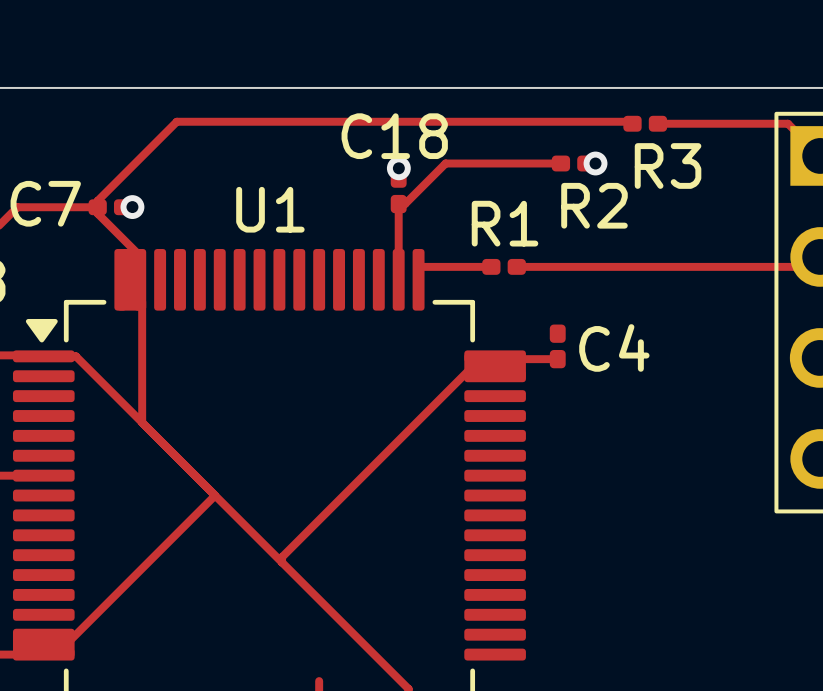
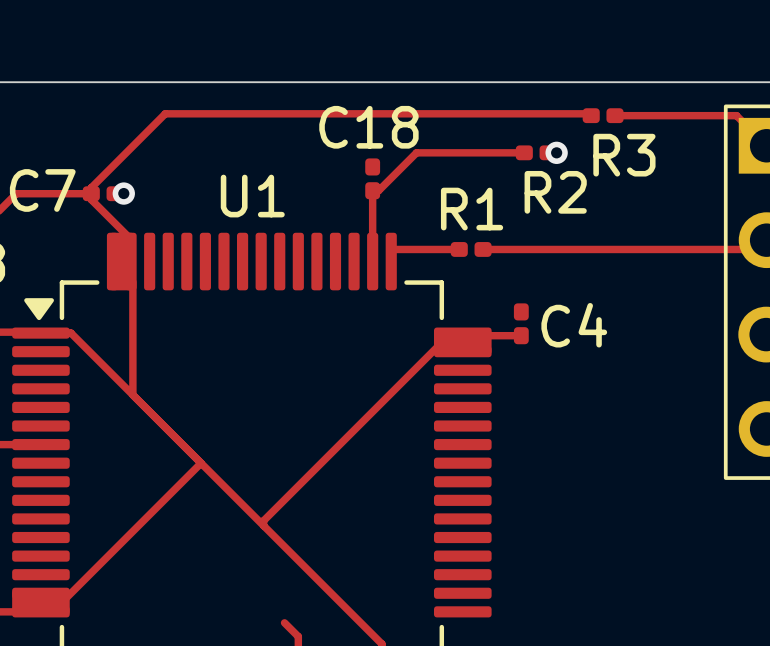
via: (398, 168) -> none
track: none -> (284, 622) (298, 636)

